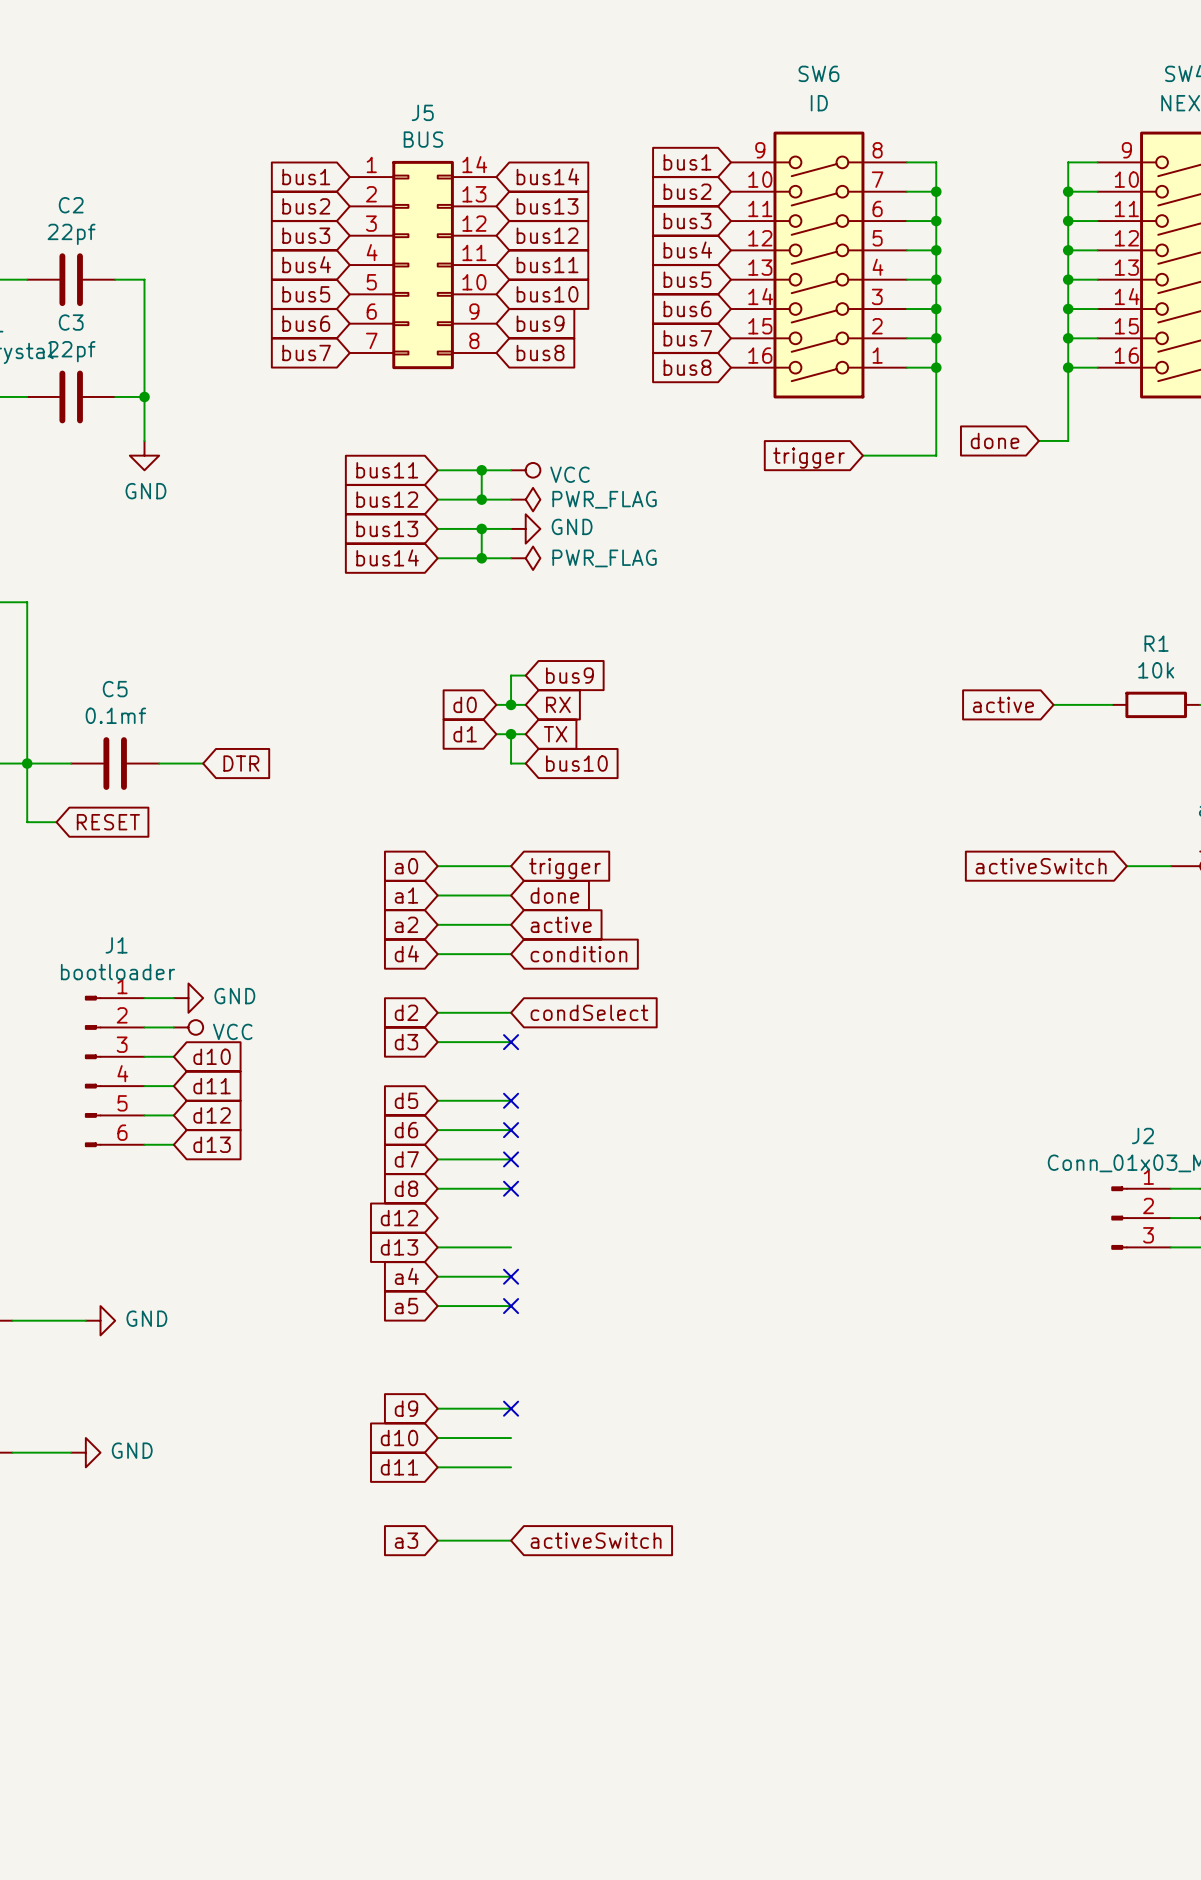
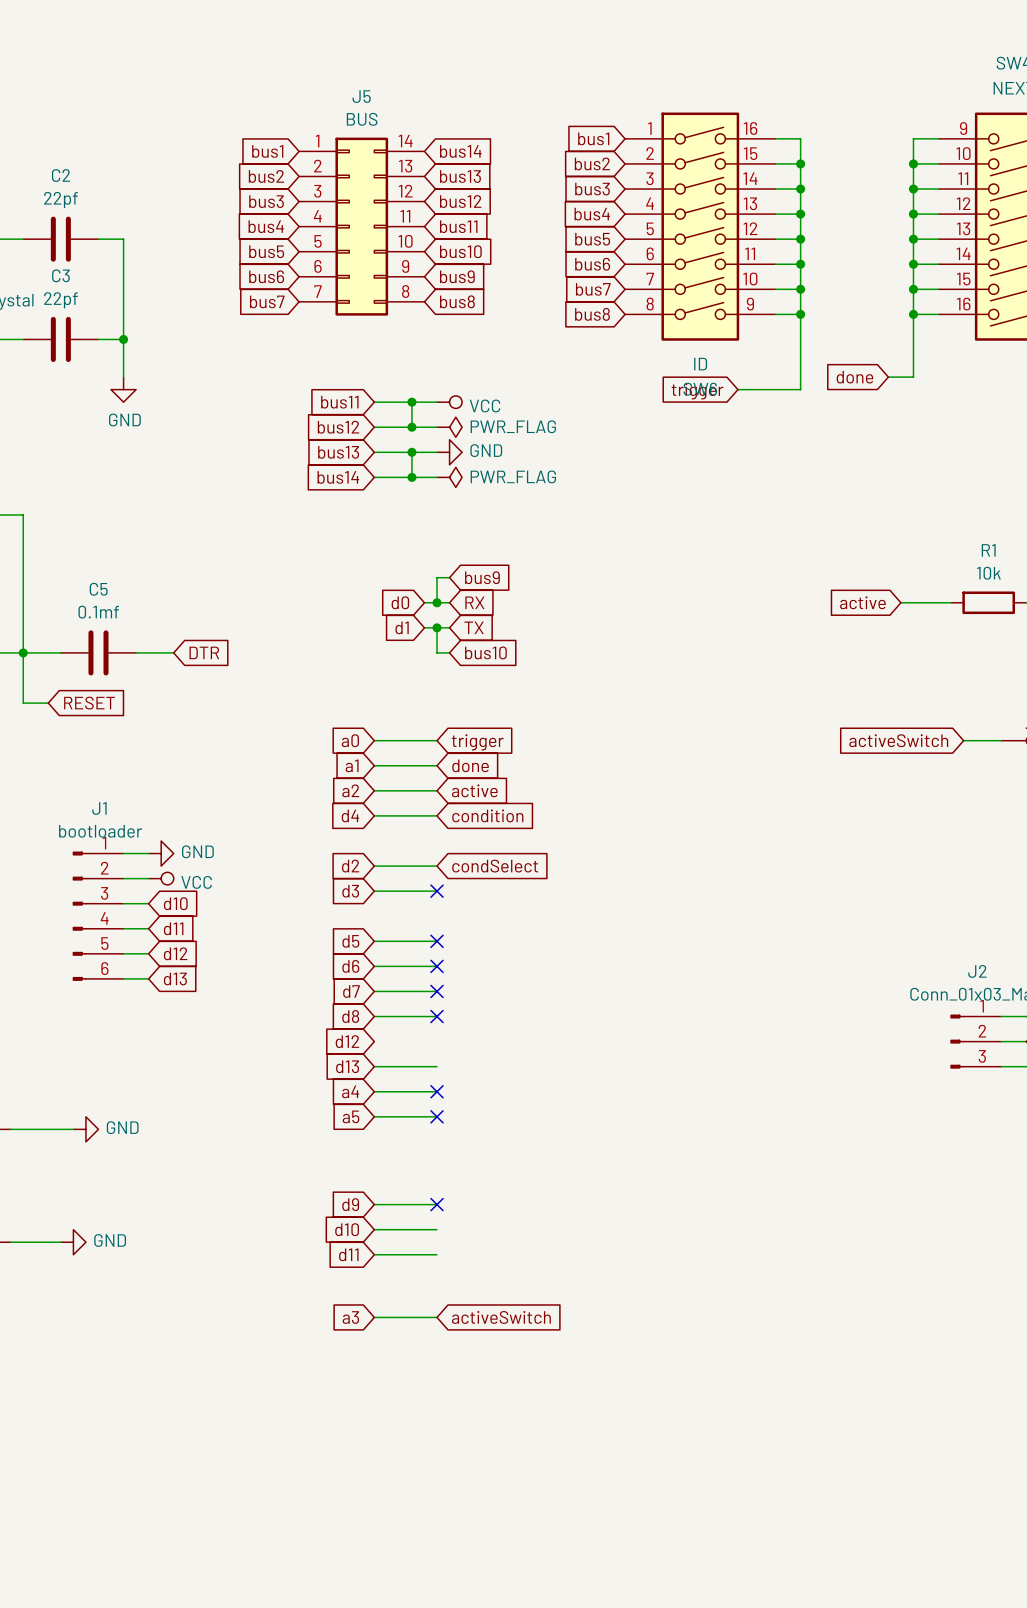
SW6 rotation: 0° (818, 265) -> 180° (700, 226)

